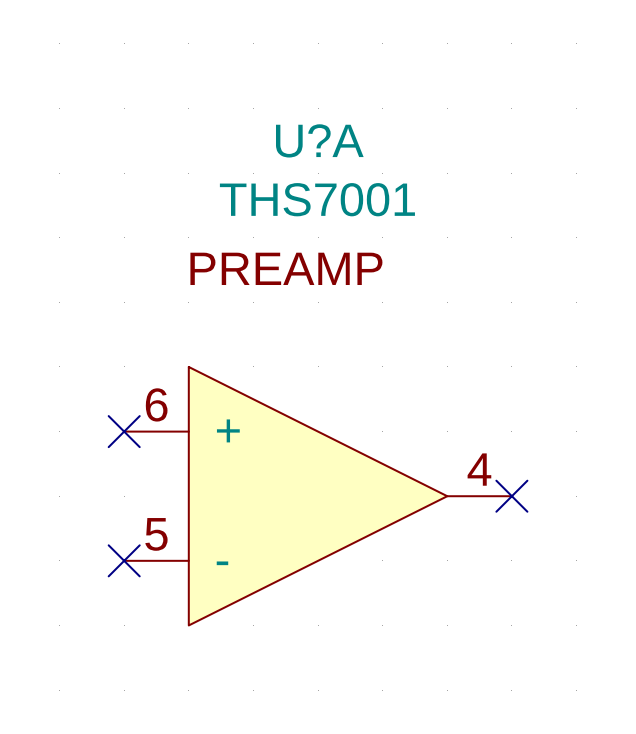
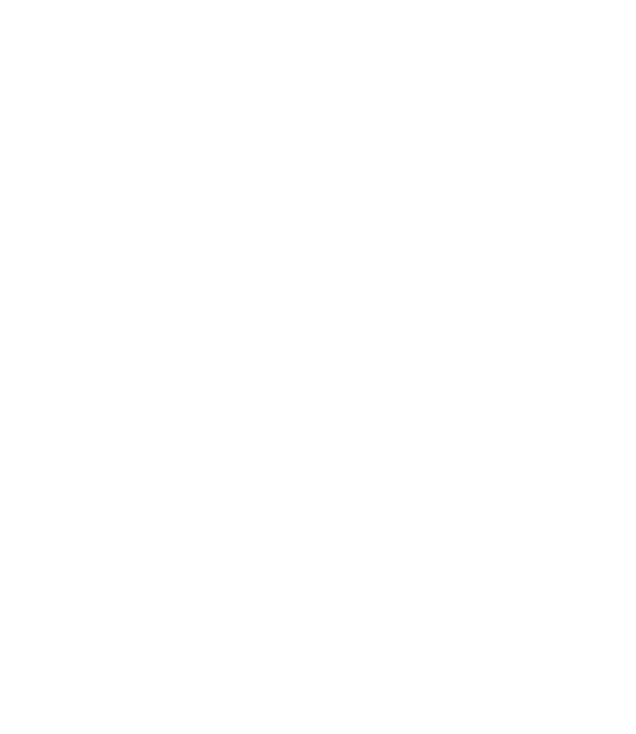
no-connect mark: (124, 431) -> none
U?A: THS7001 (318, 496) -> none
no-connect mark: (511, 496) -> none
no-connect mark: (124, 560) -> none

